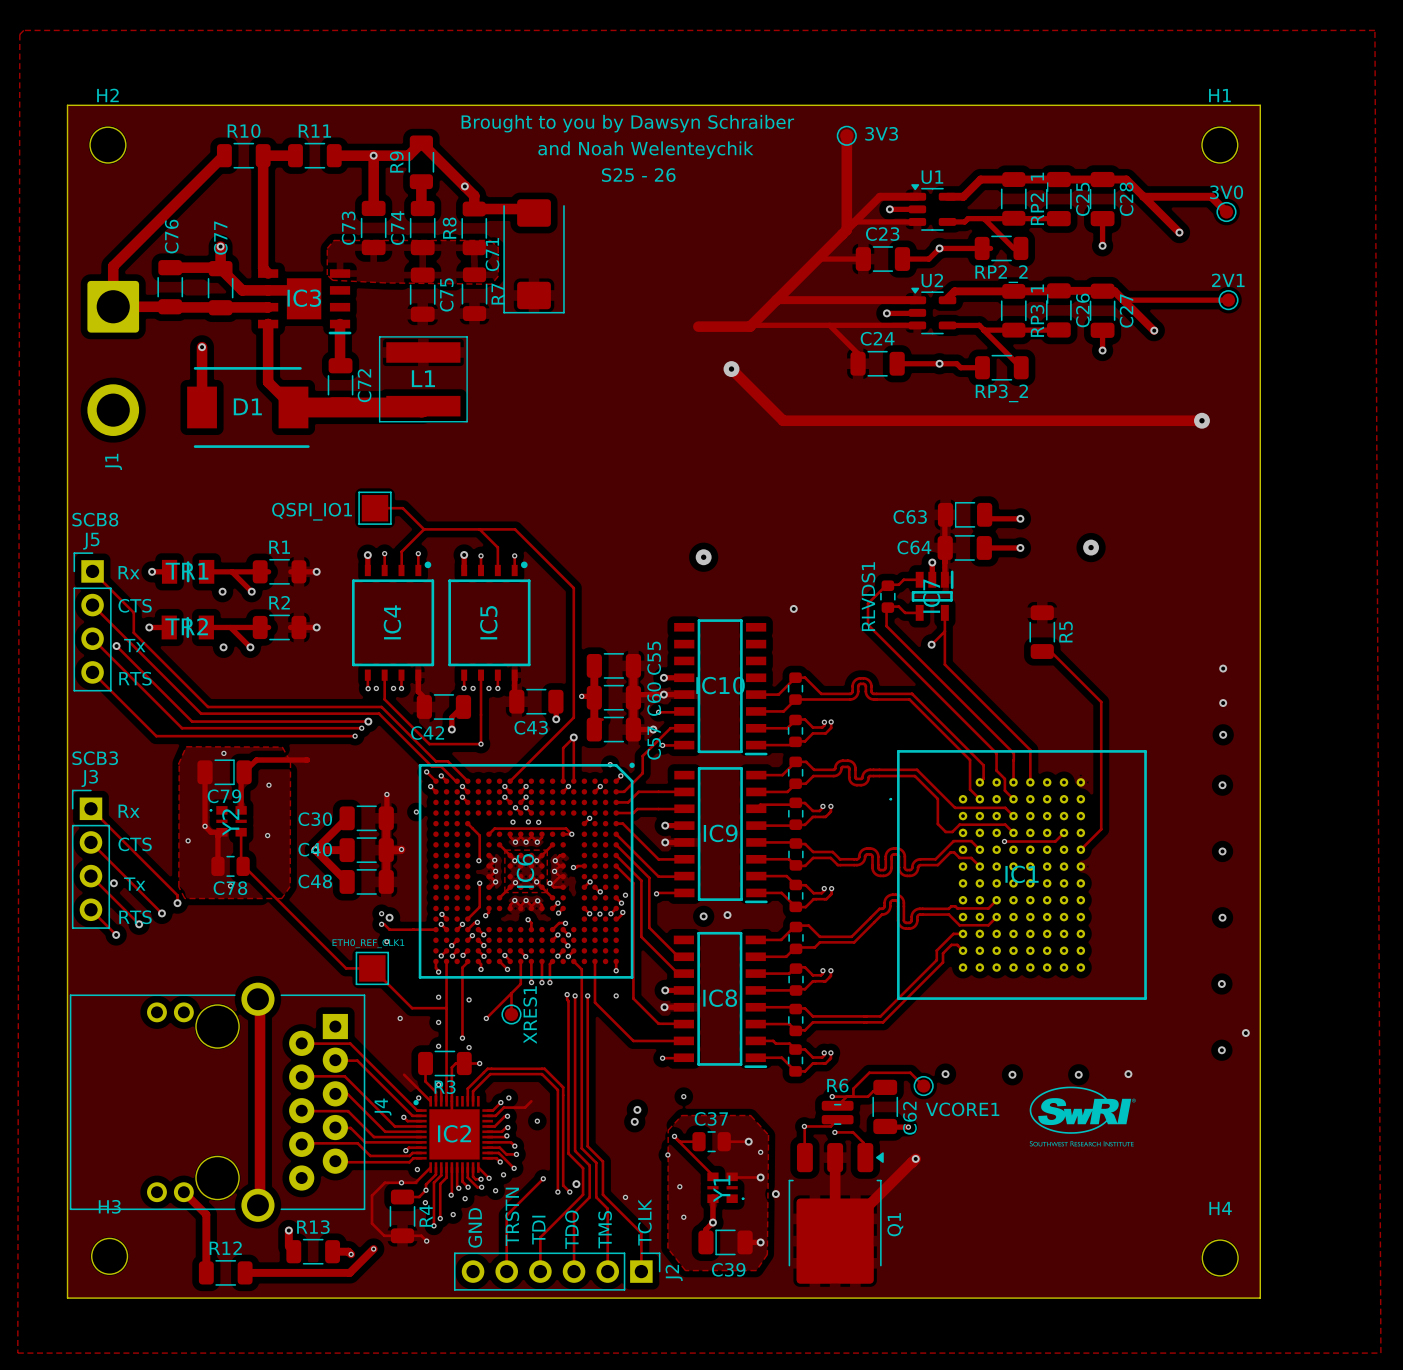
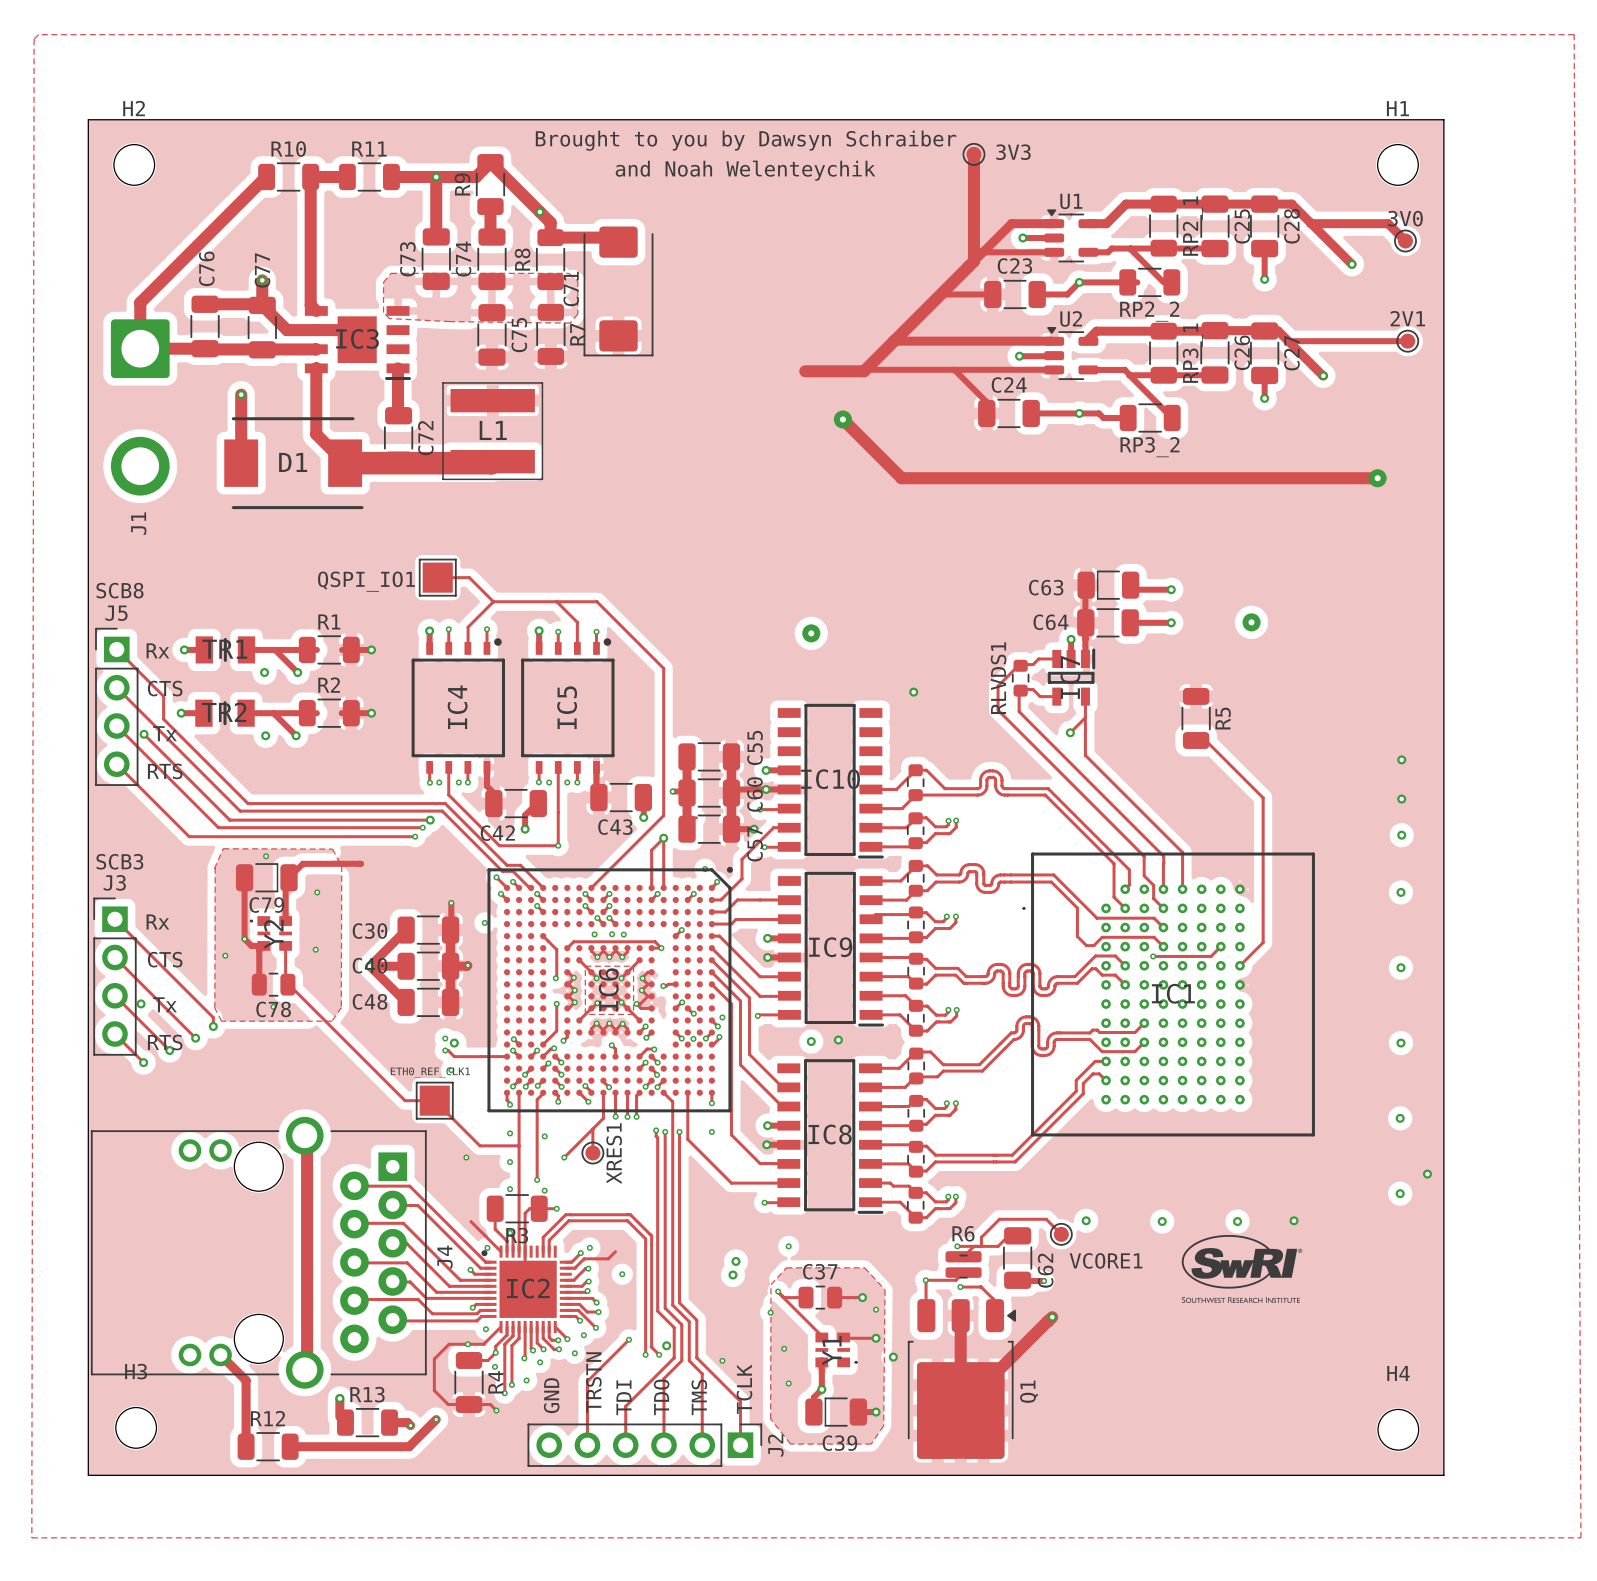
text: S25 - 26 (638, 175) -> none

